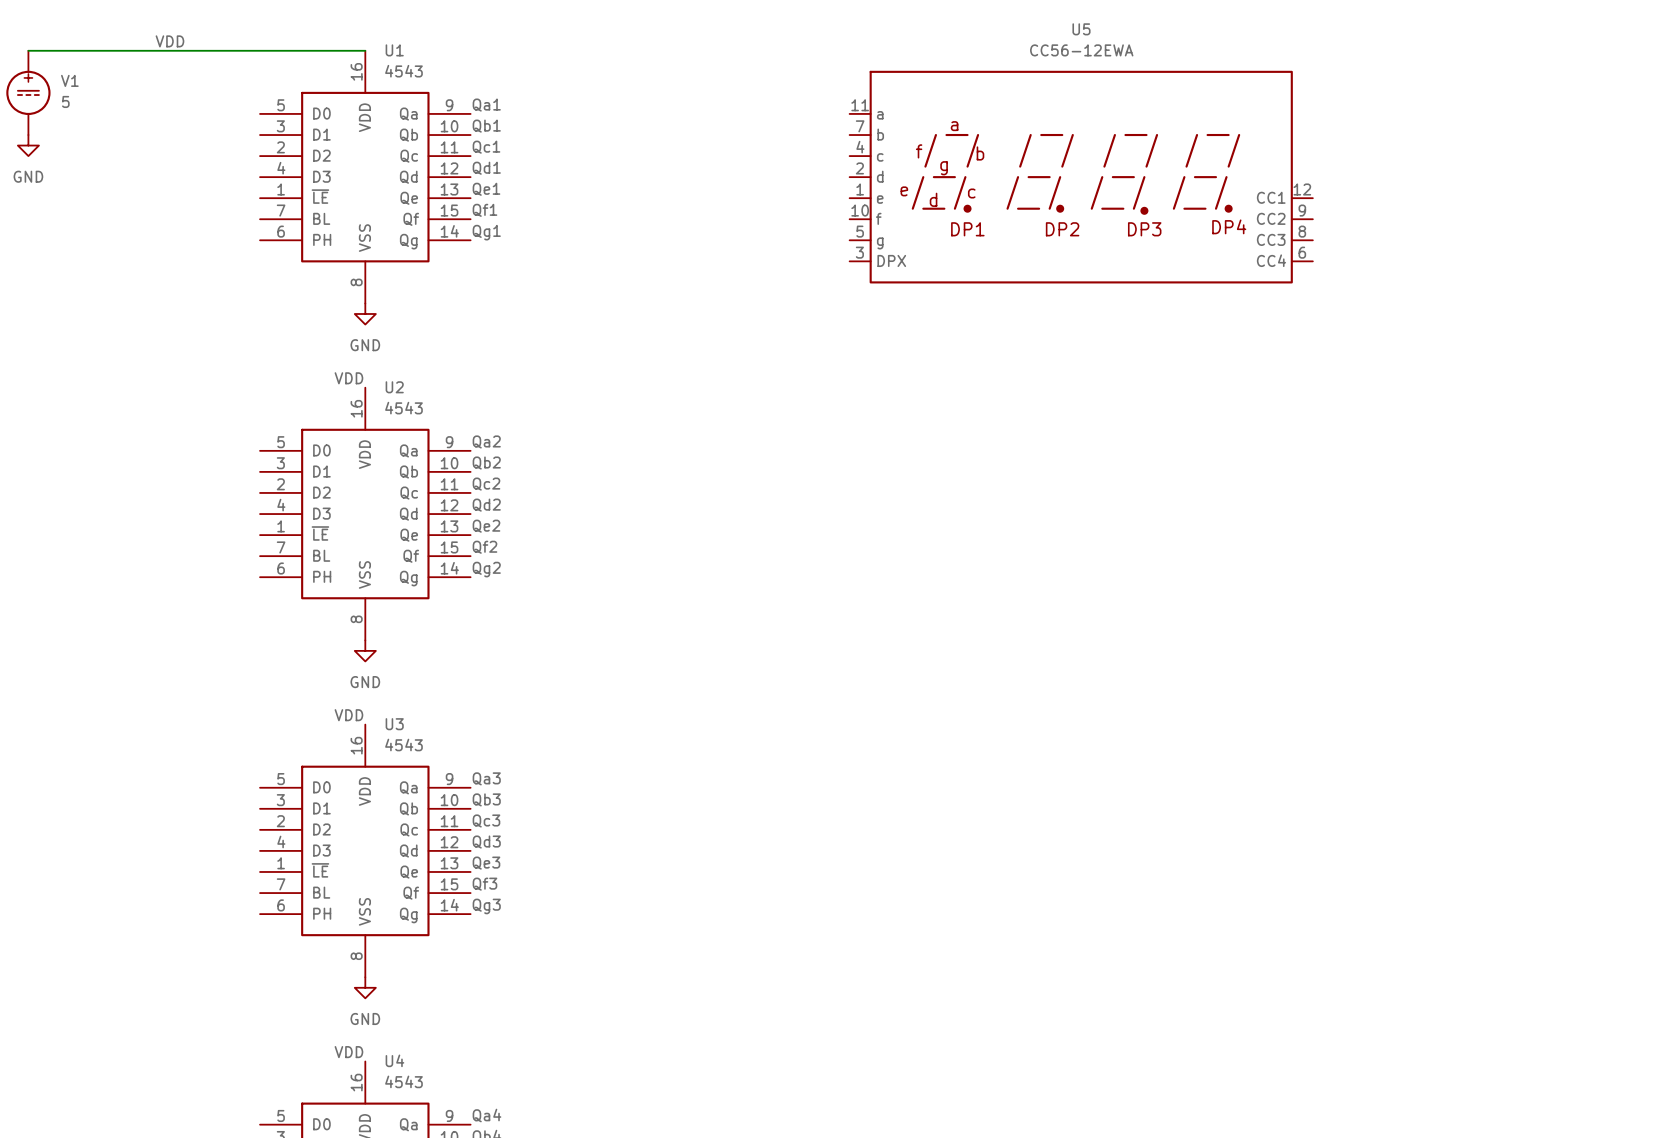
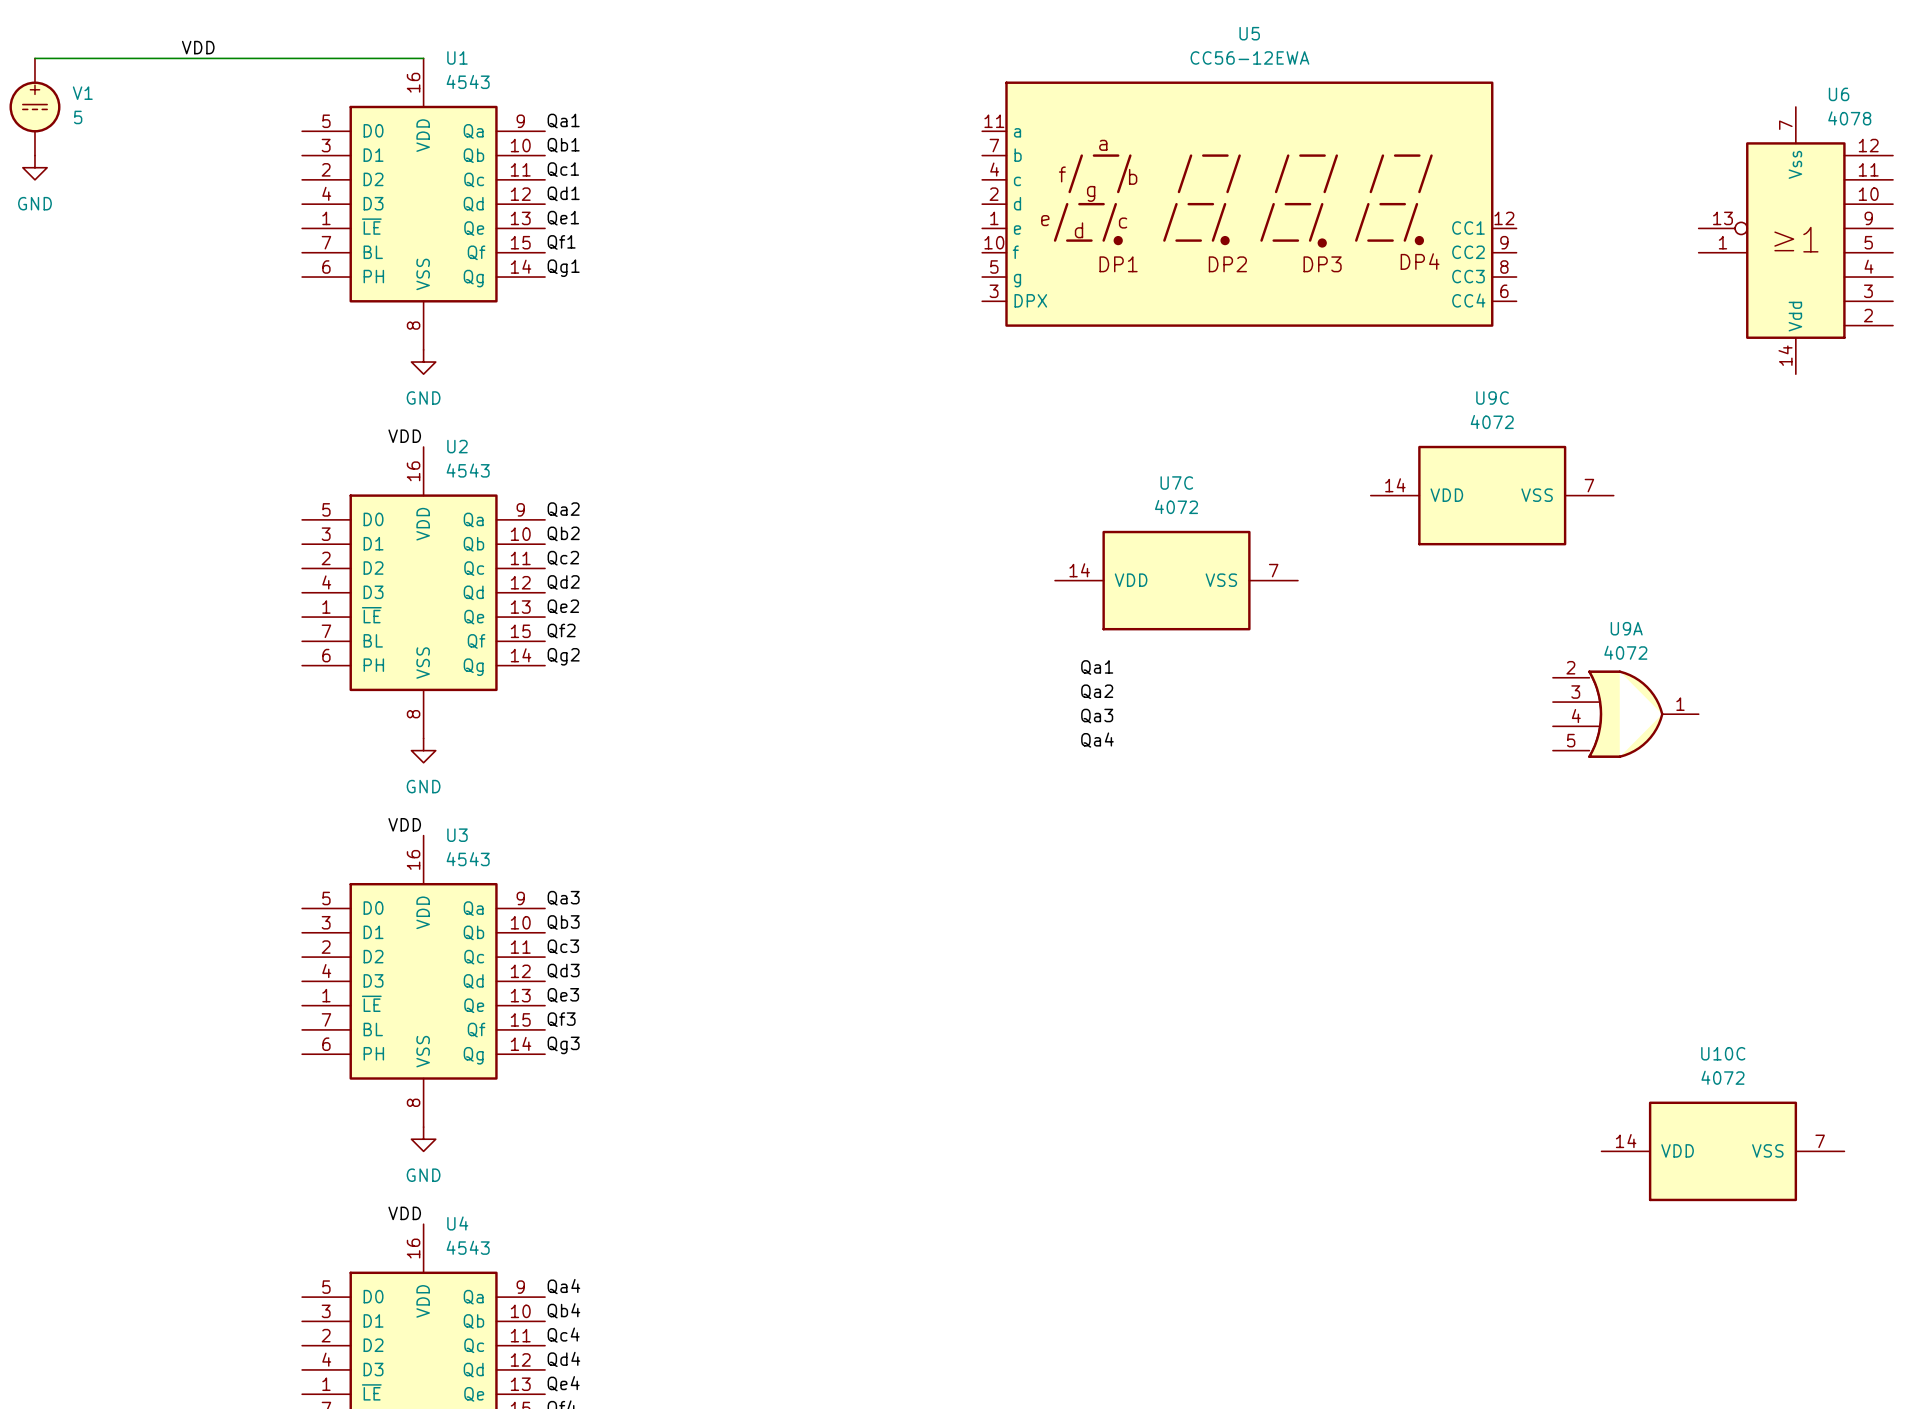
U6: none -> 4078 (1795, 240)
U9C: none -> 4072 (1492, 495)
U7C: none -> 4072 (1176, 580)
label: none -> Qa1 (1097, 667)
label: none -> Qa2 (1097, 691)
U9A: none -> 4072 (1625, 714)
label: none -> Qa3 (1097, 716)
label: none -> Qa4 (1097, 740)
U10C: none -> 4072 (1722, 1151)

